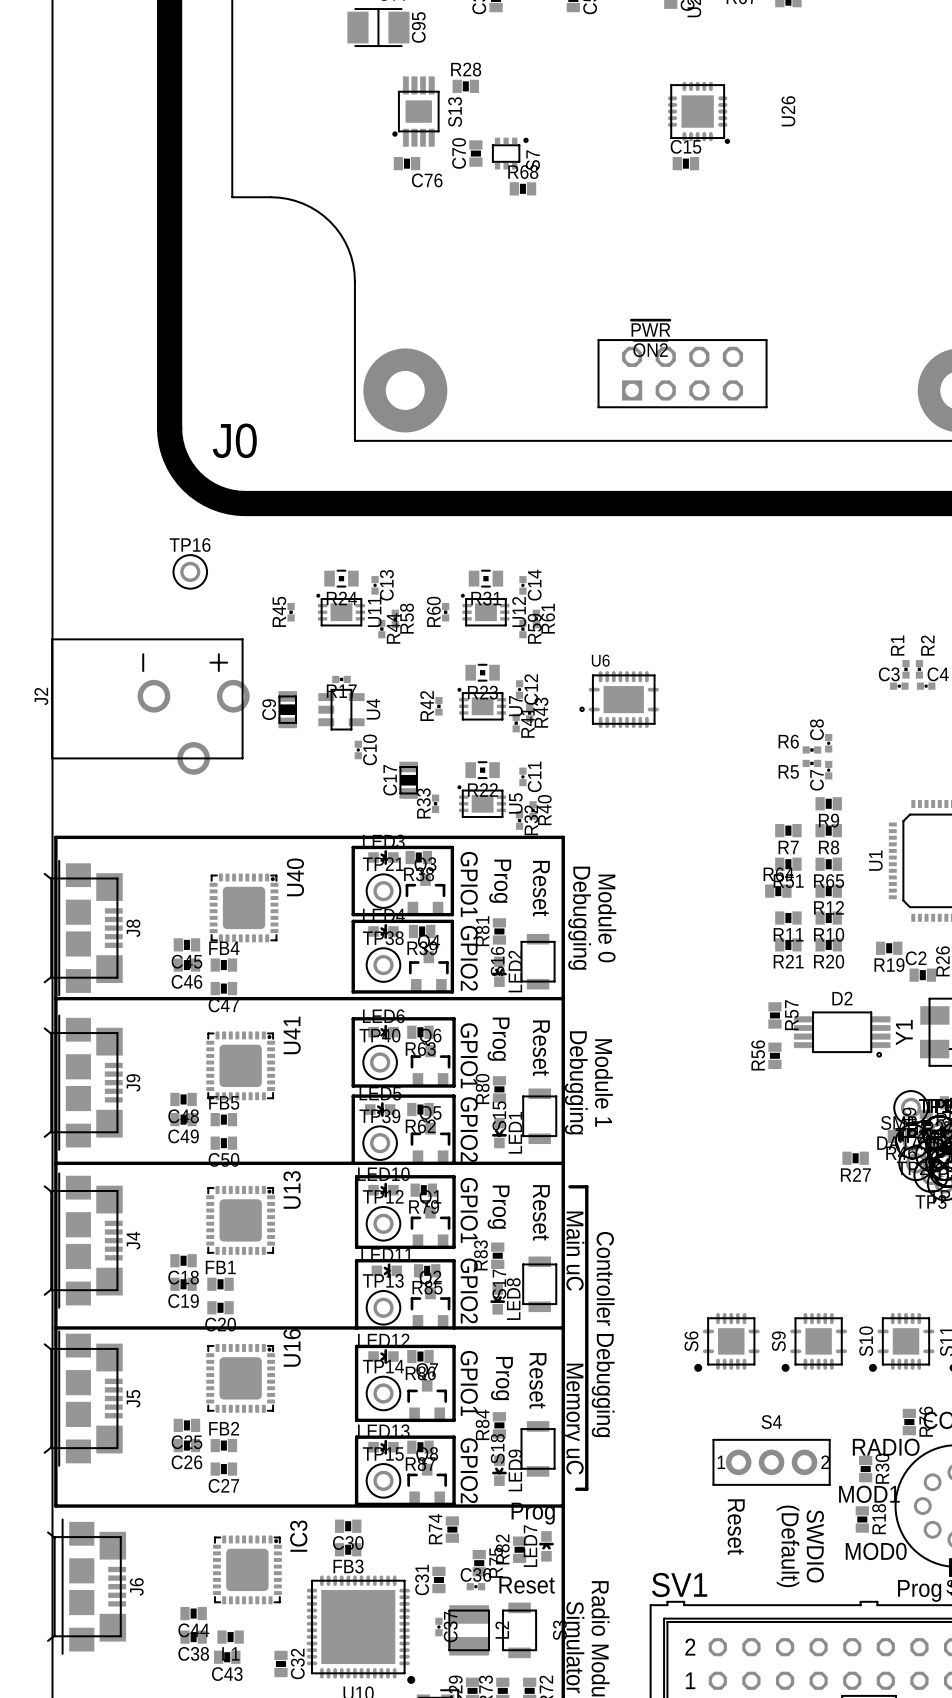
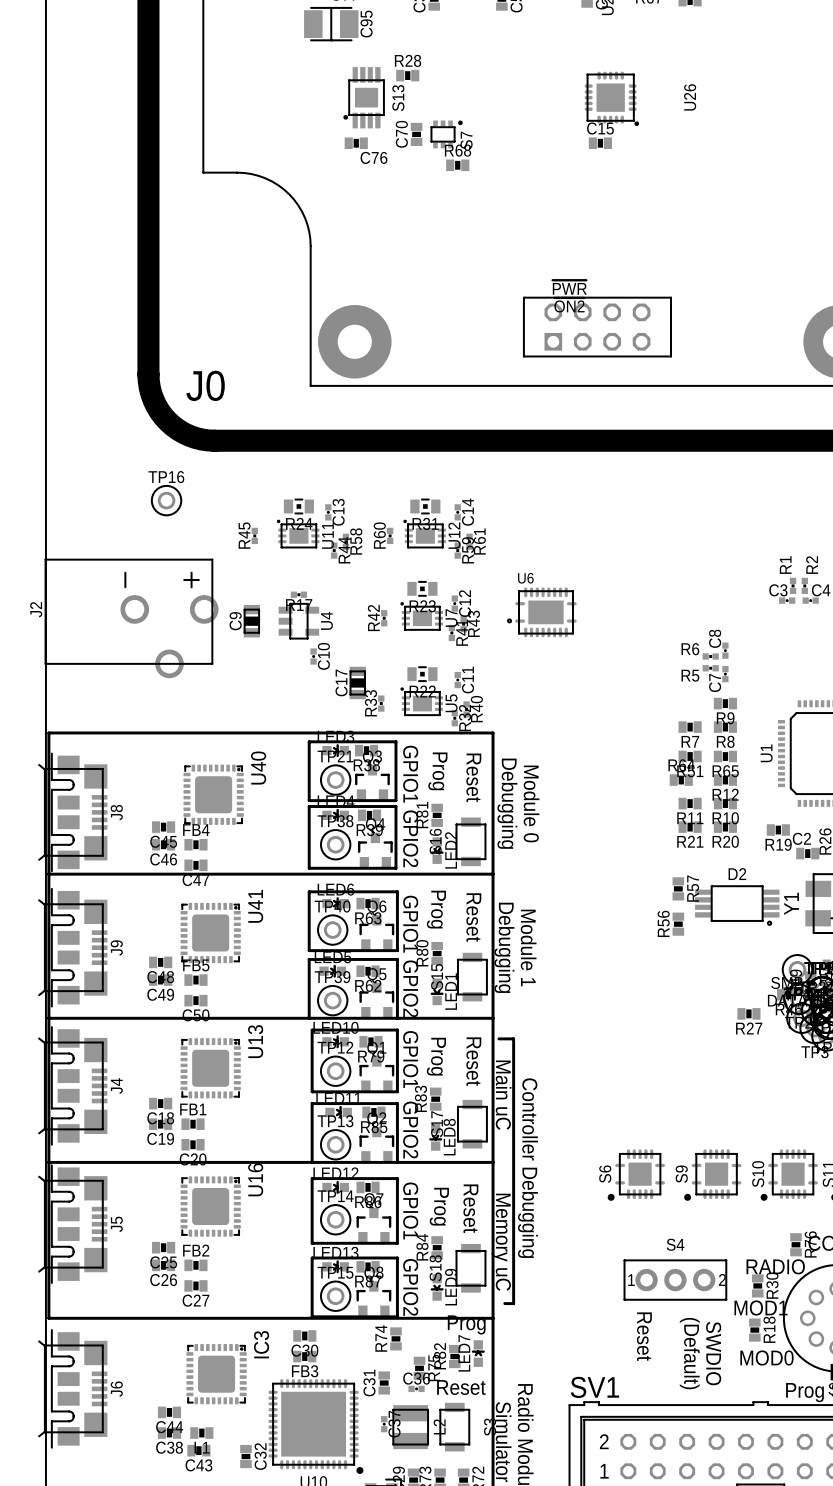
J8 footprint: [43, 860, 123, 996] -> [38, 753, 108, 872]
J9 footprint: [43, 1015, 123, 1150] -> [38, 888, 108, 1007]
J4 footprint: [43, 1173, 123, 1308] -> [38, 1027, 108, 1145]
J5 footprint: [43, 1331, 123, 1466] -> [38, 1165, 108, 1284]
J6 footprint: [47, 1519, 127, 1654] -> [38, 1330, 108, 1448]

